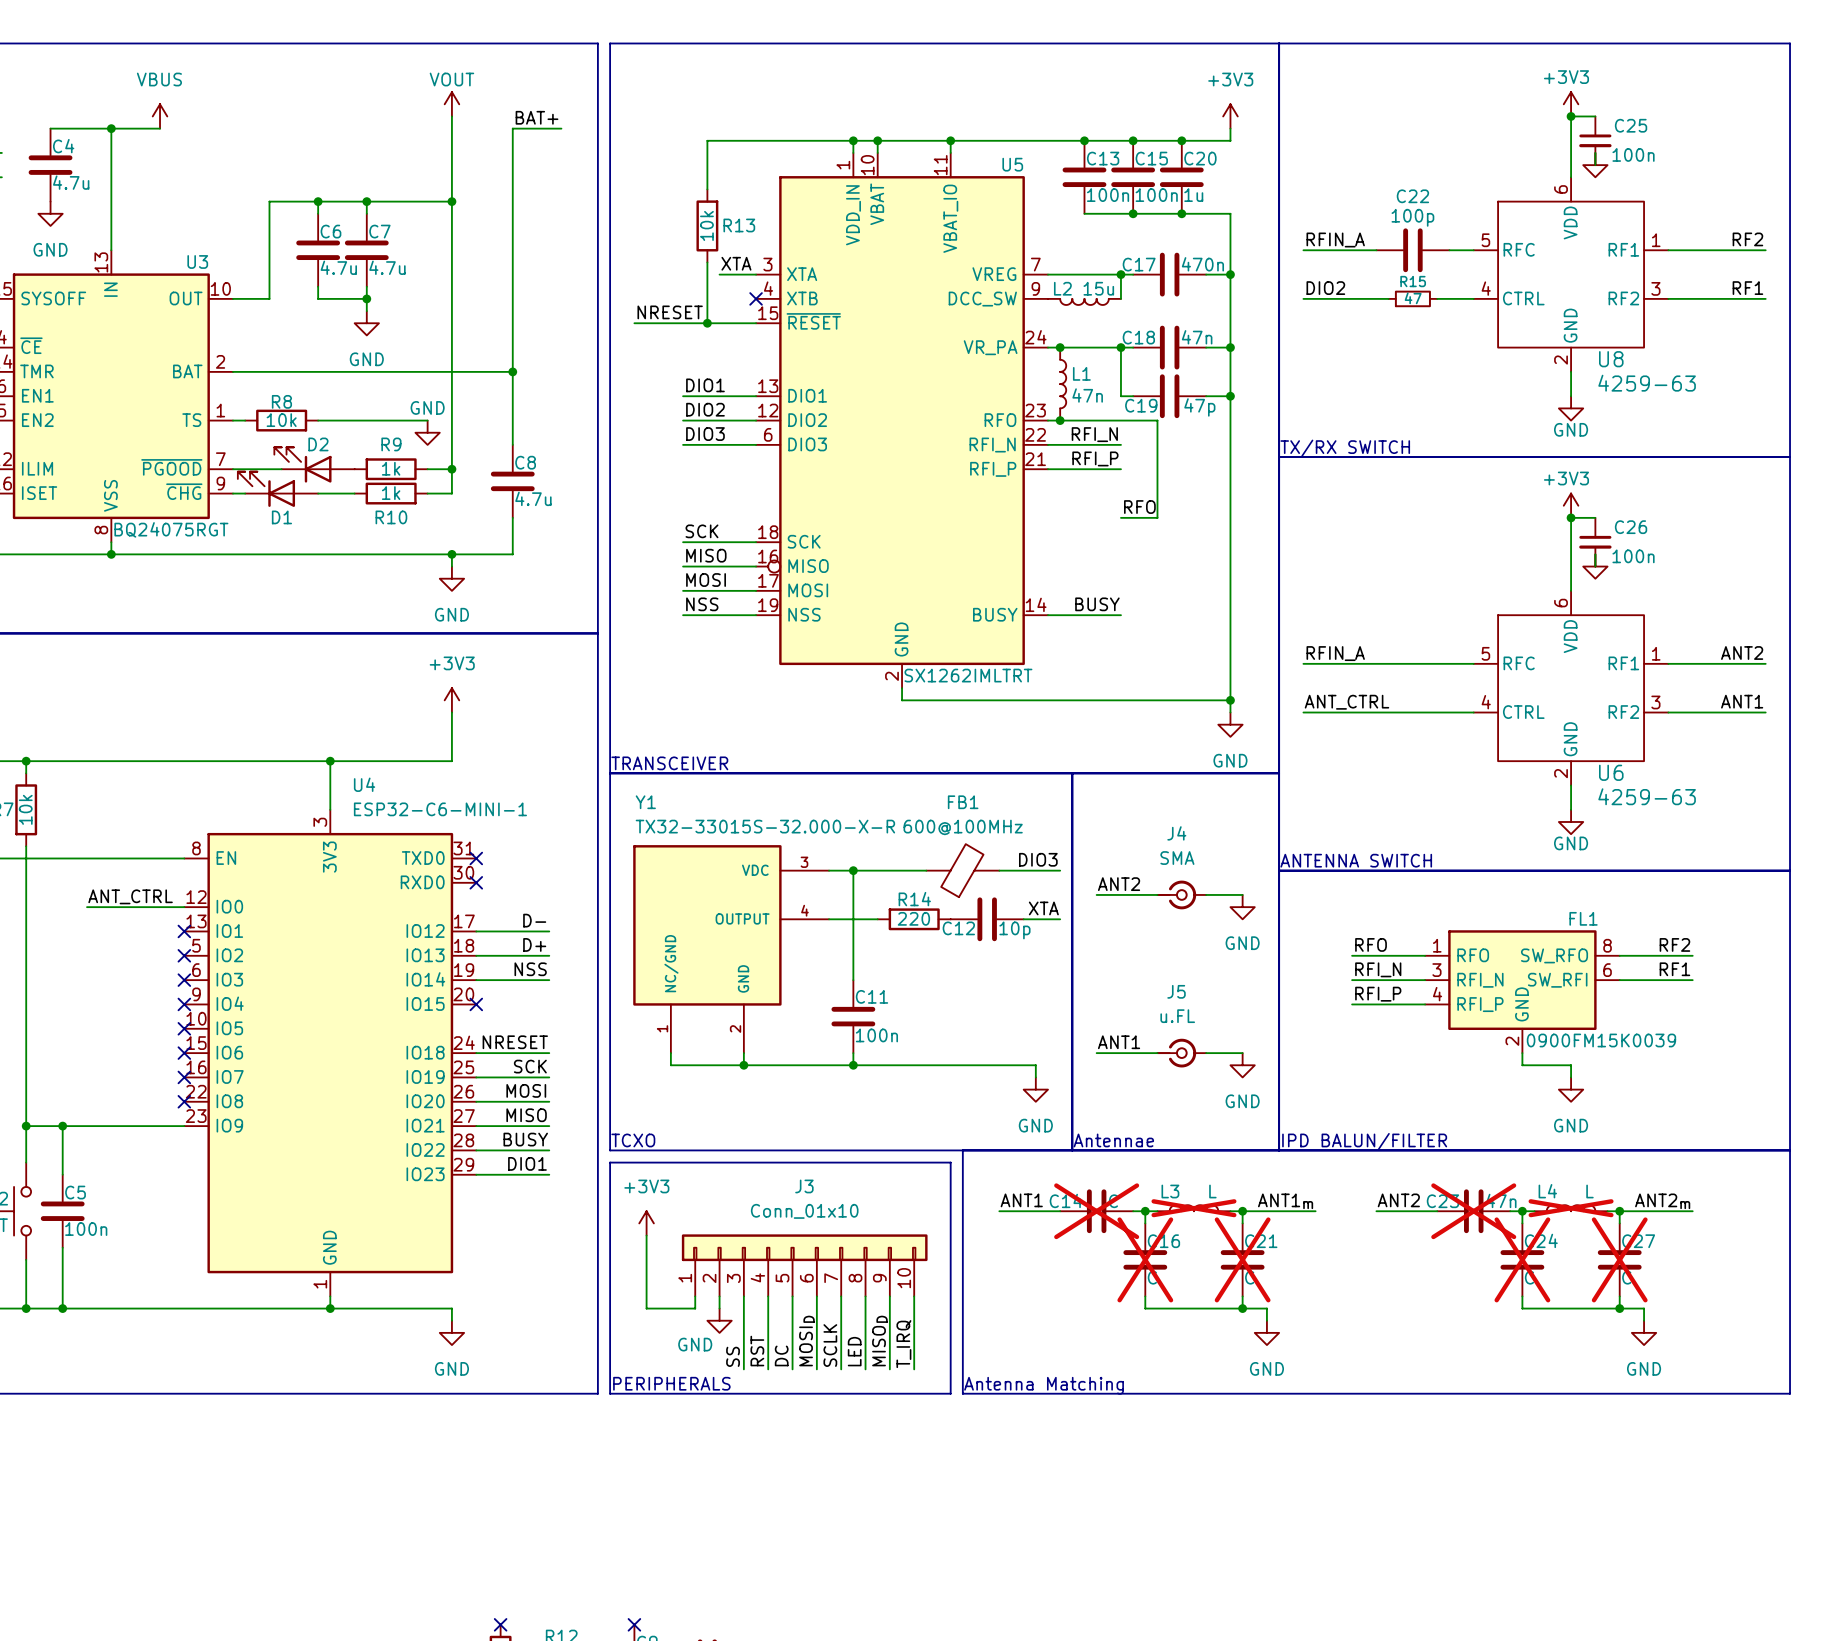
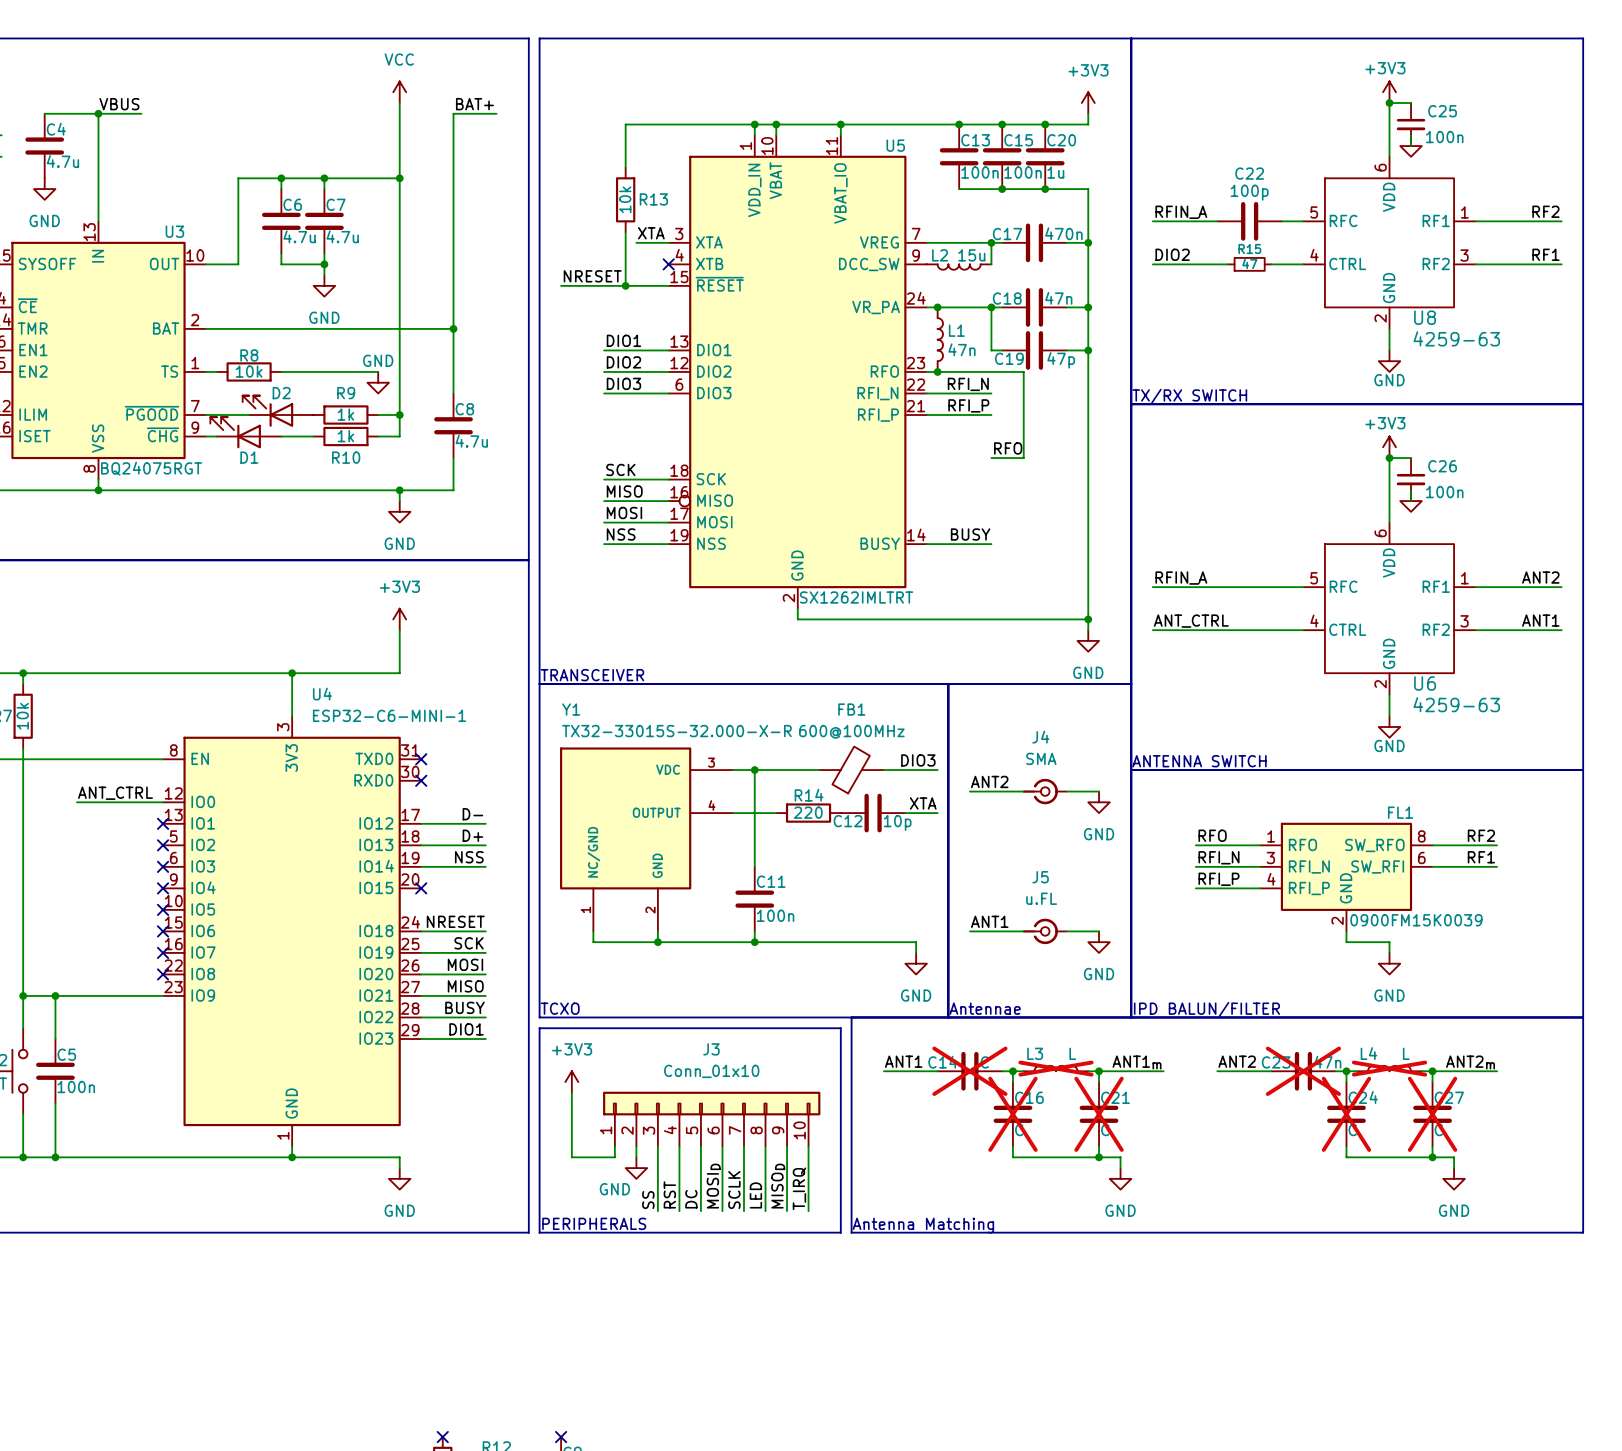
power symbol: VOUT (451, 104) -> VCC (399, 92)
power symbol: VBUS (160, 116) -> none
label: none -> VBUS (119, 104)

